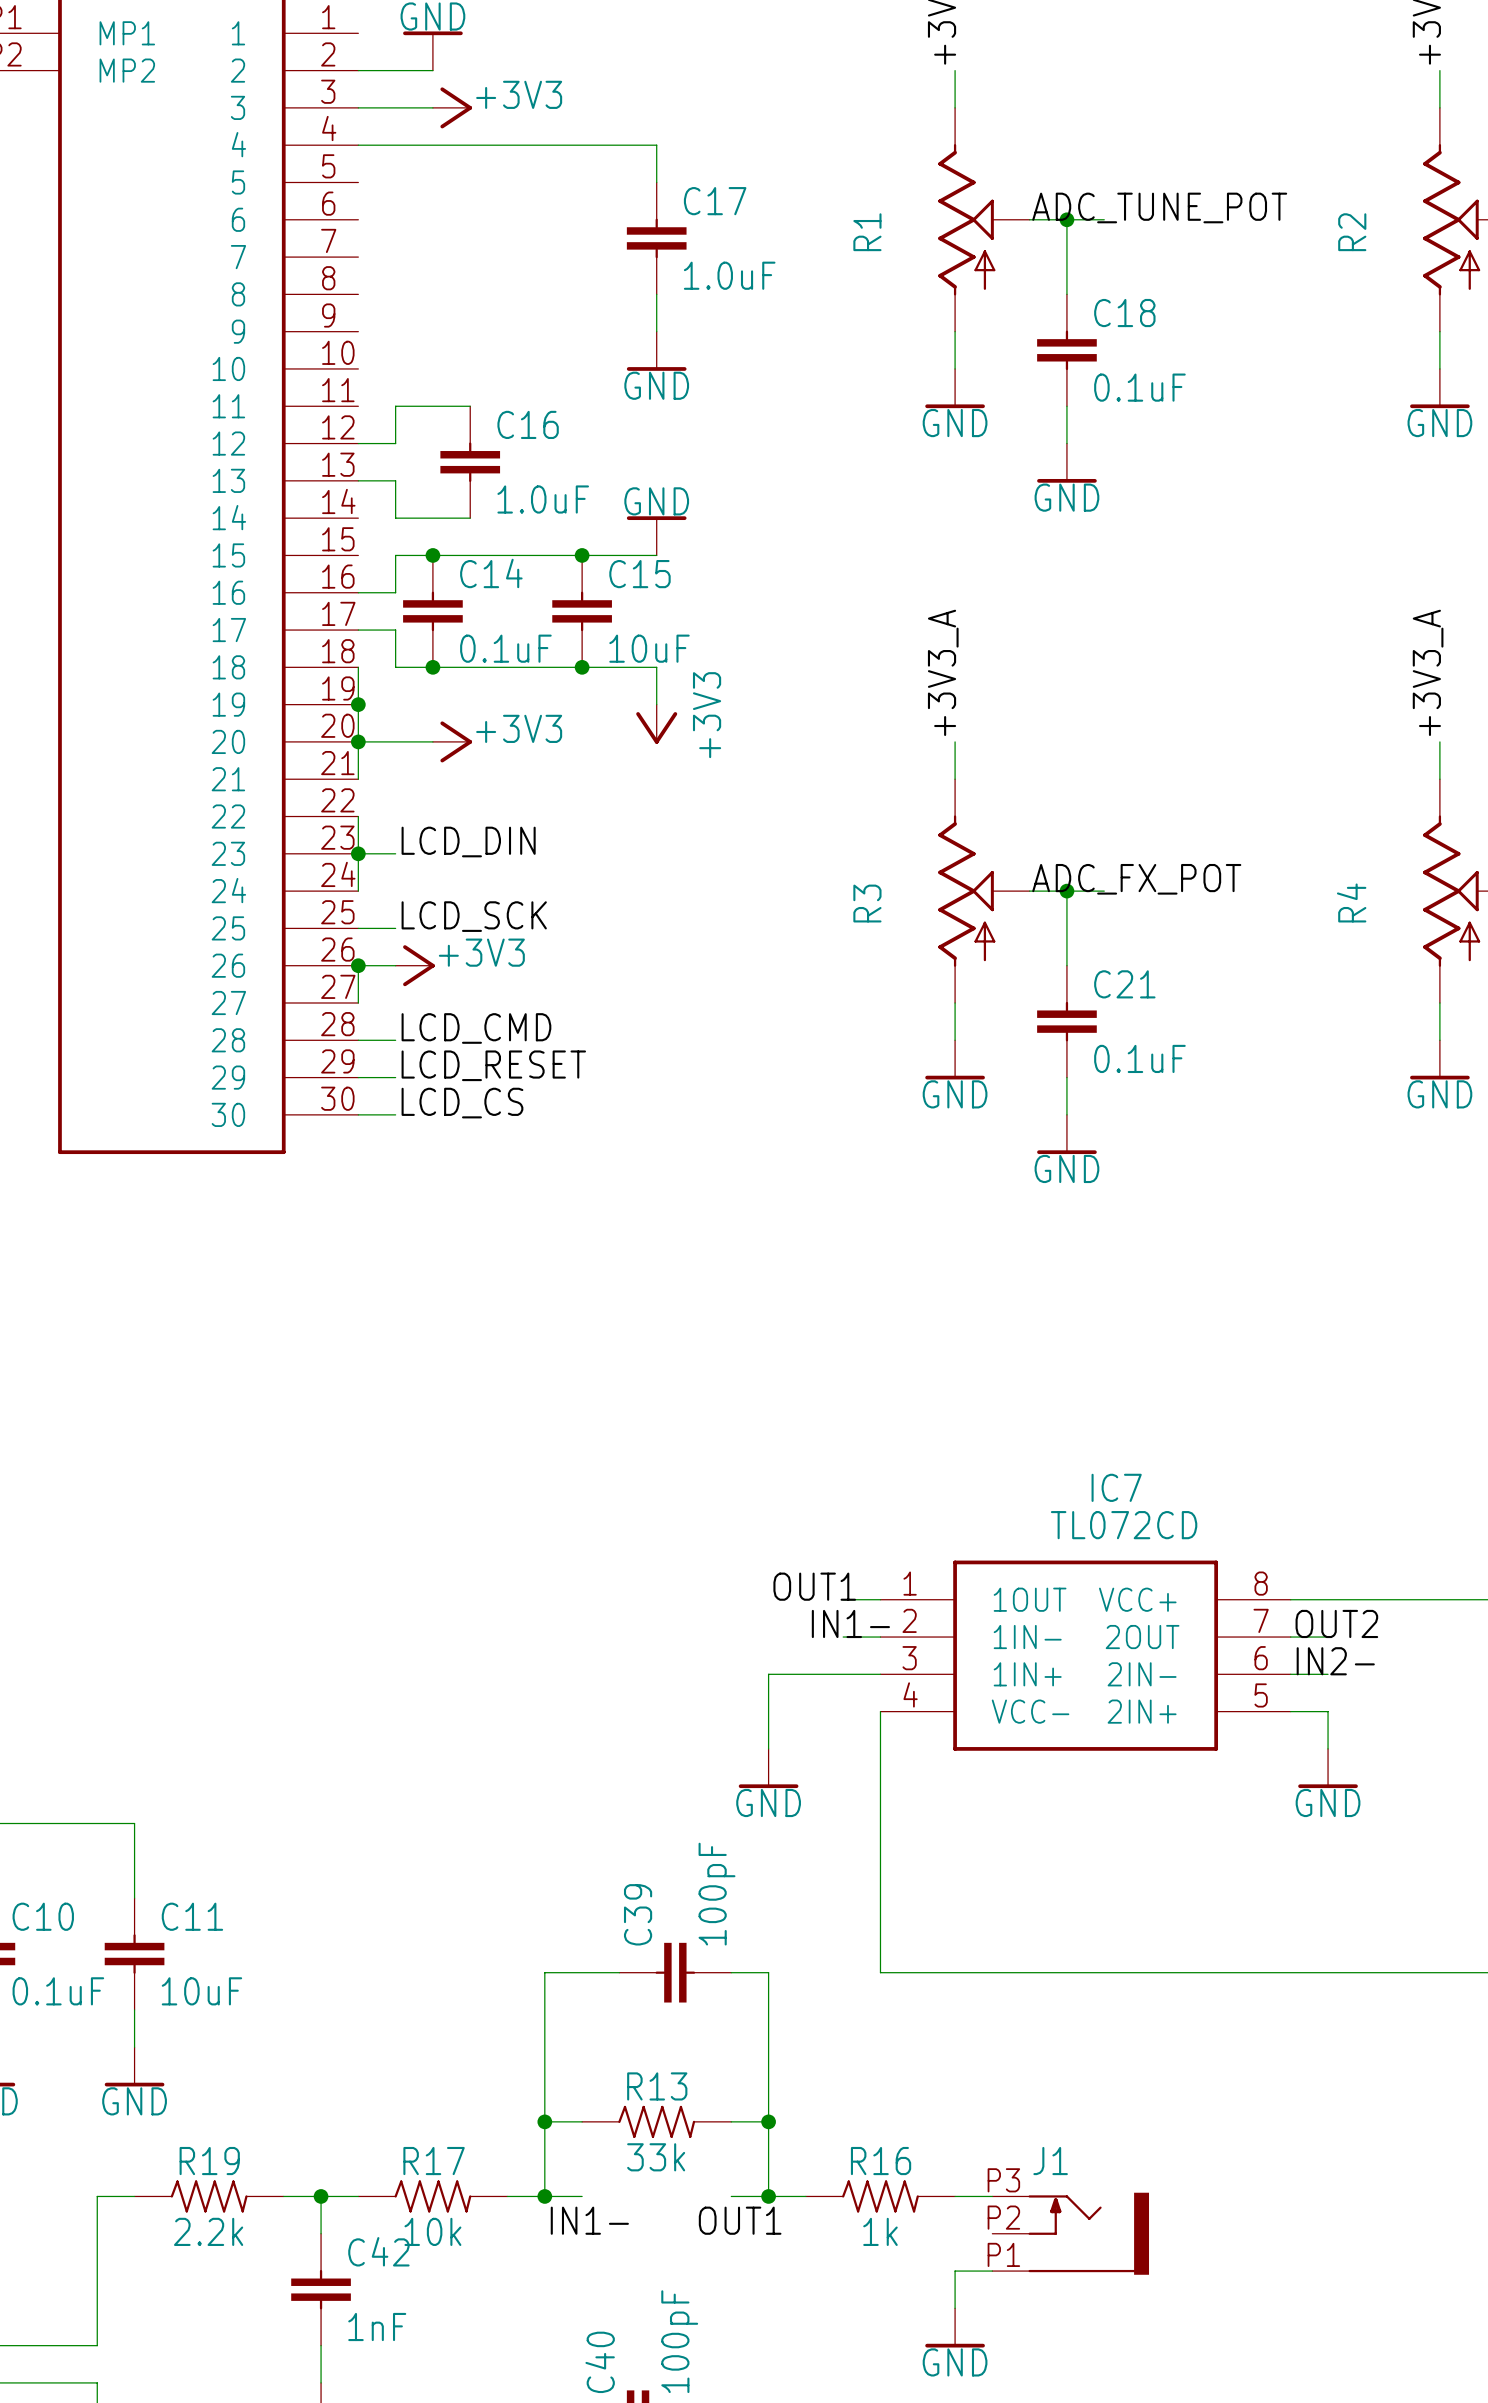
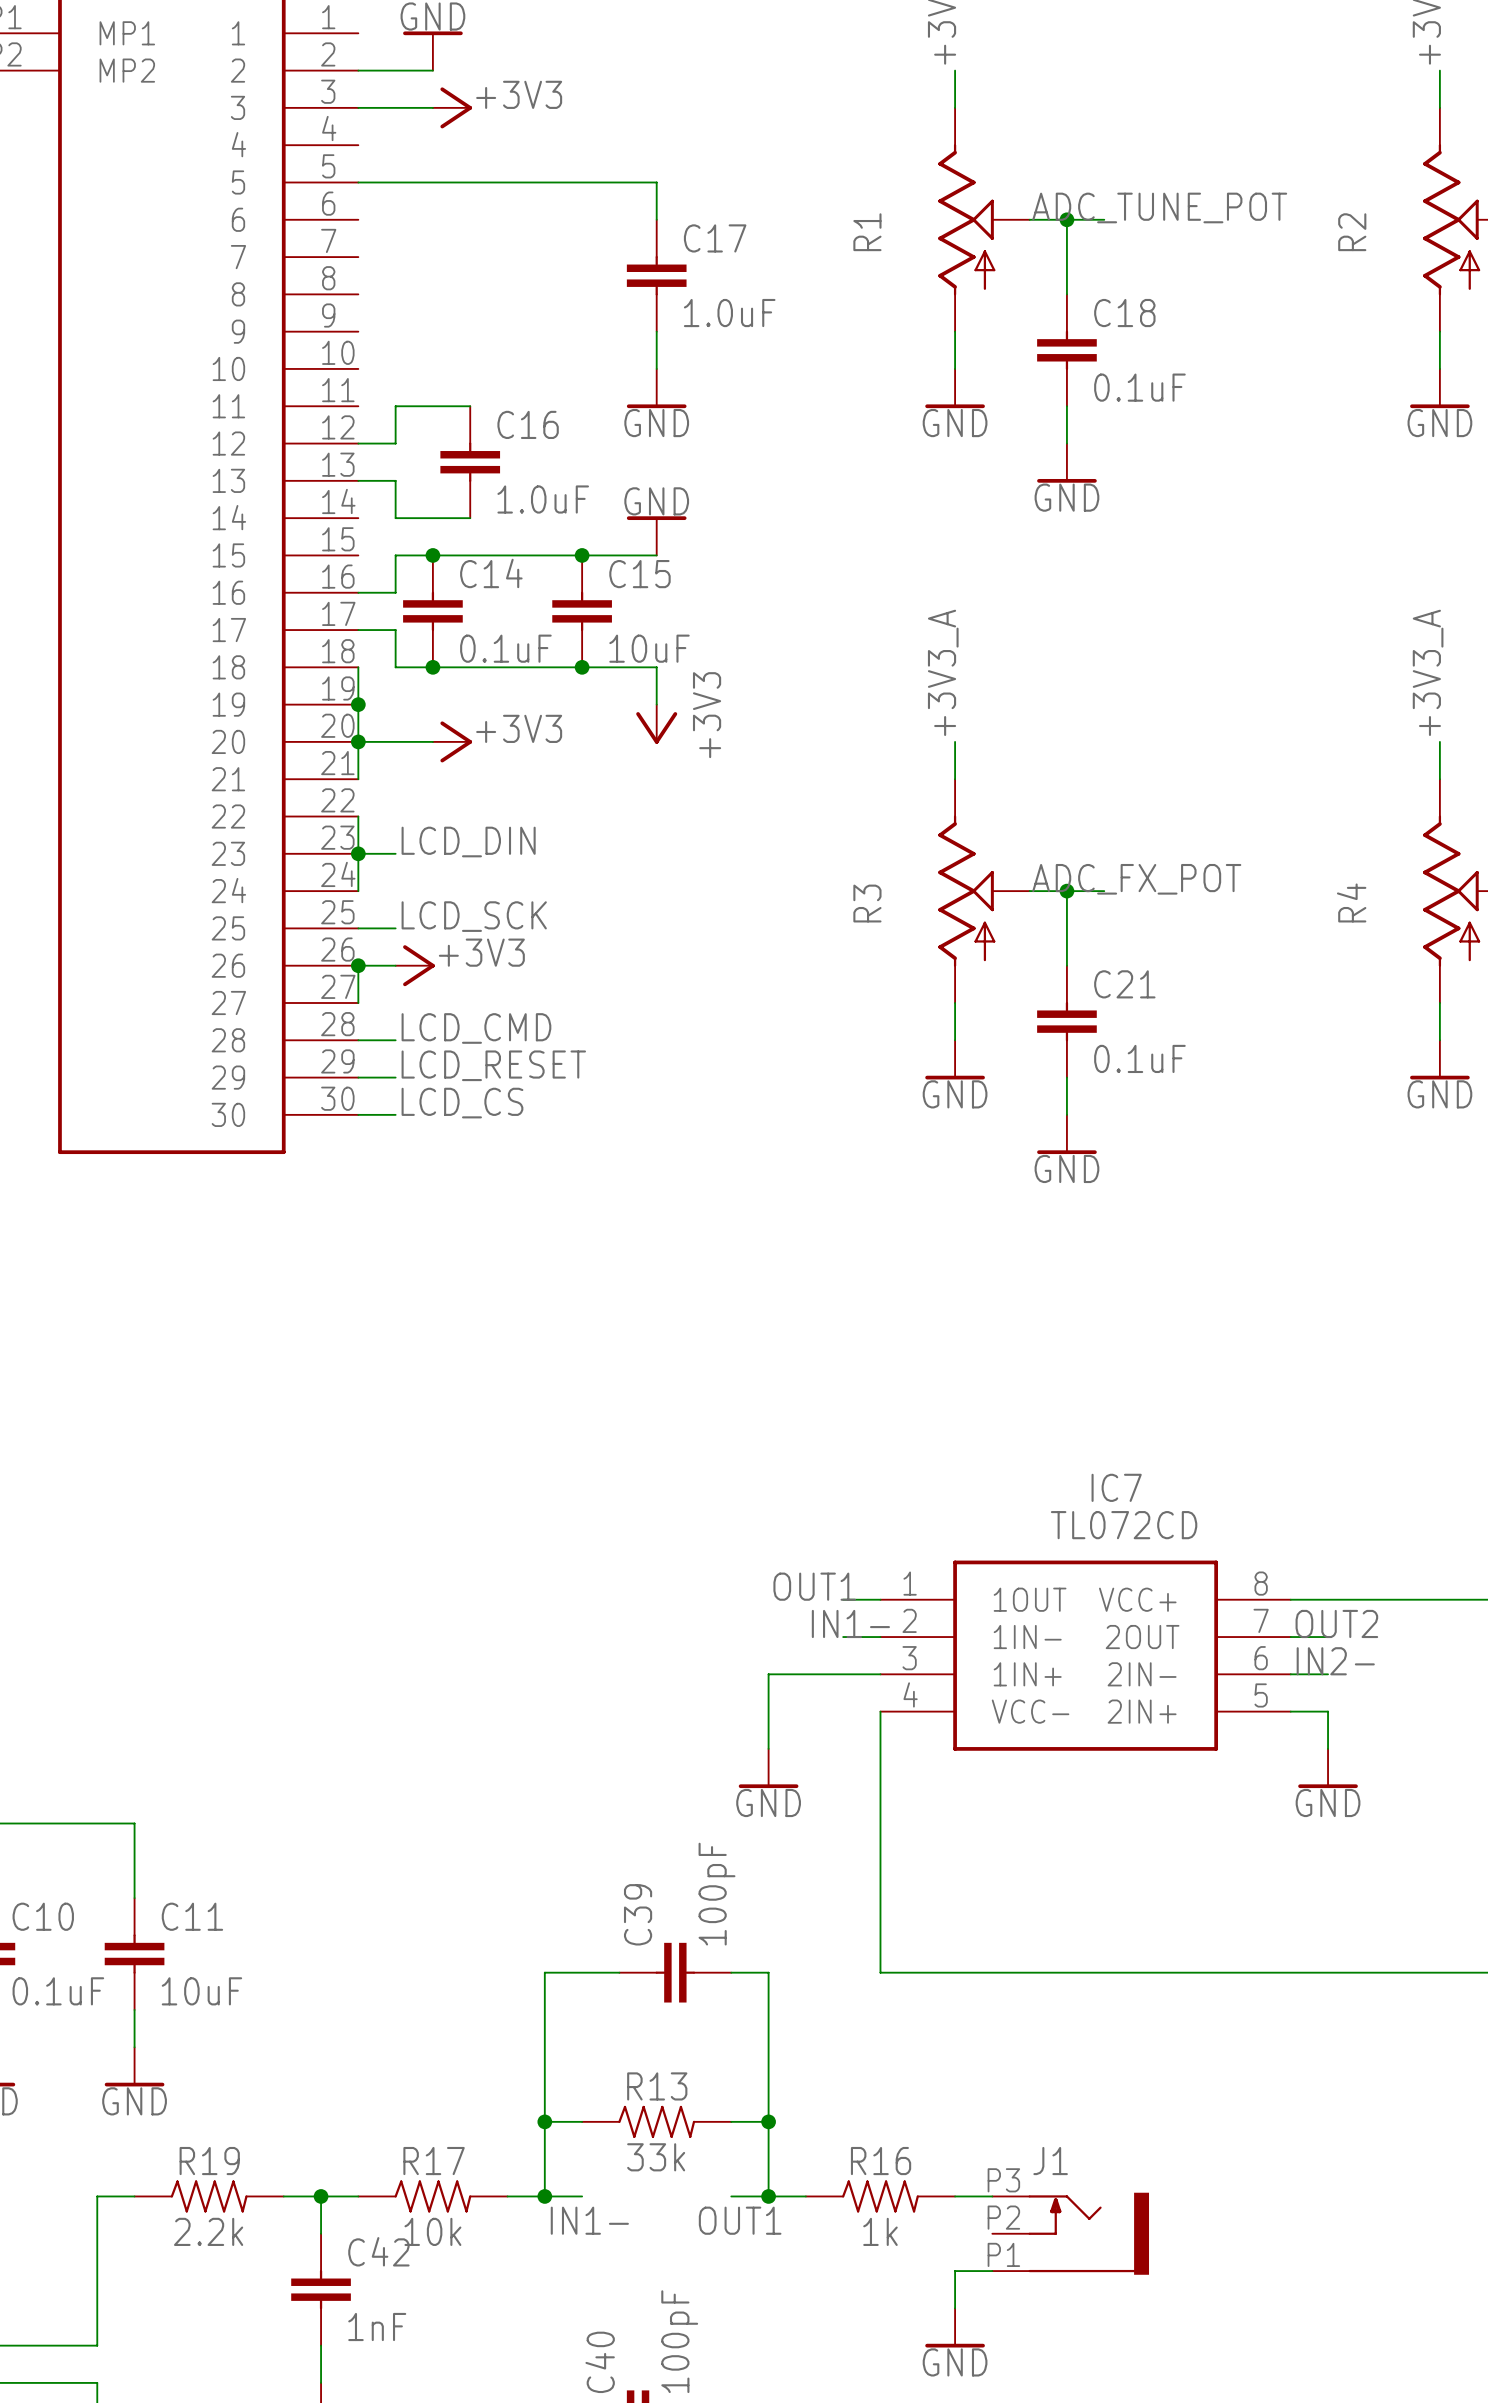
wire: (358, 145) (656, 145) (656, 182) -> (358, 182) (656, 182) (656, 219)
C17 position: (656, 238) -> (656, 275)
power symbol position: GND (656, 351) -> GND (656, 388)

